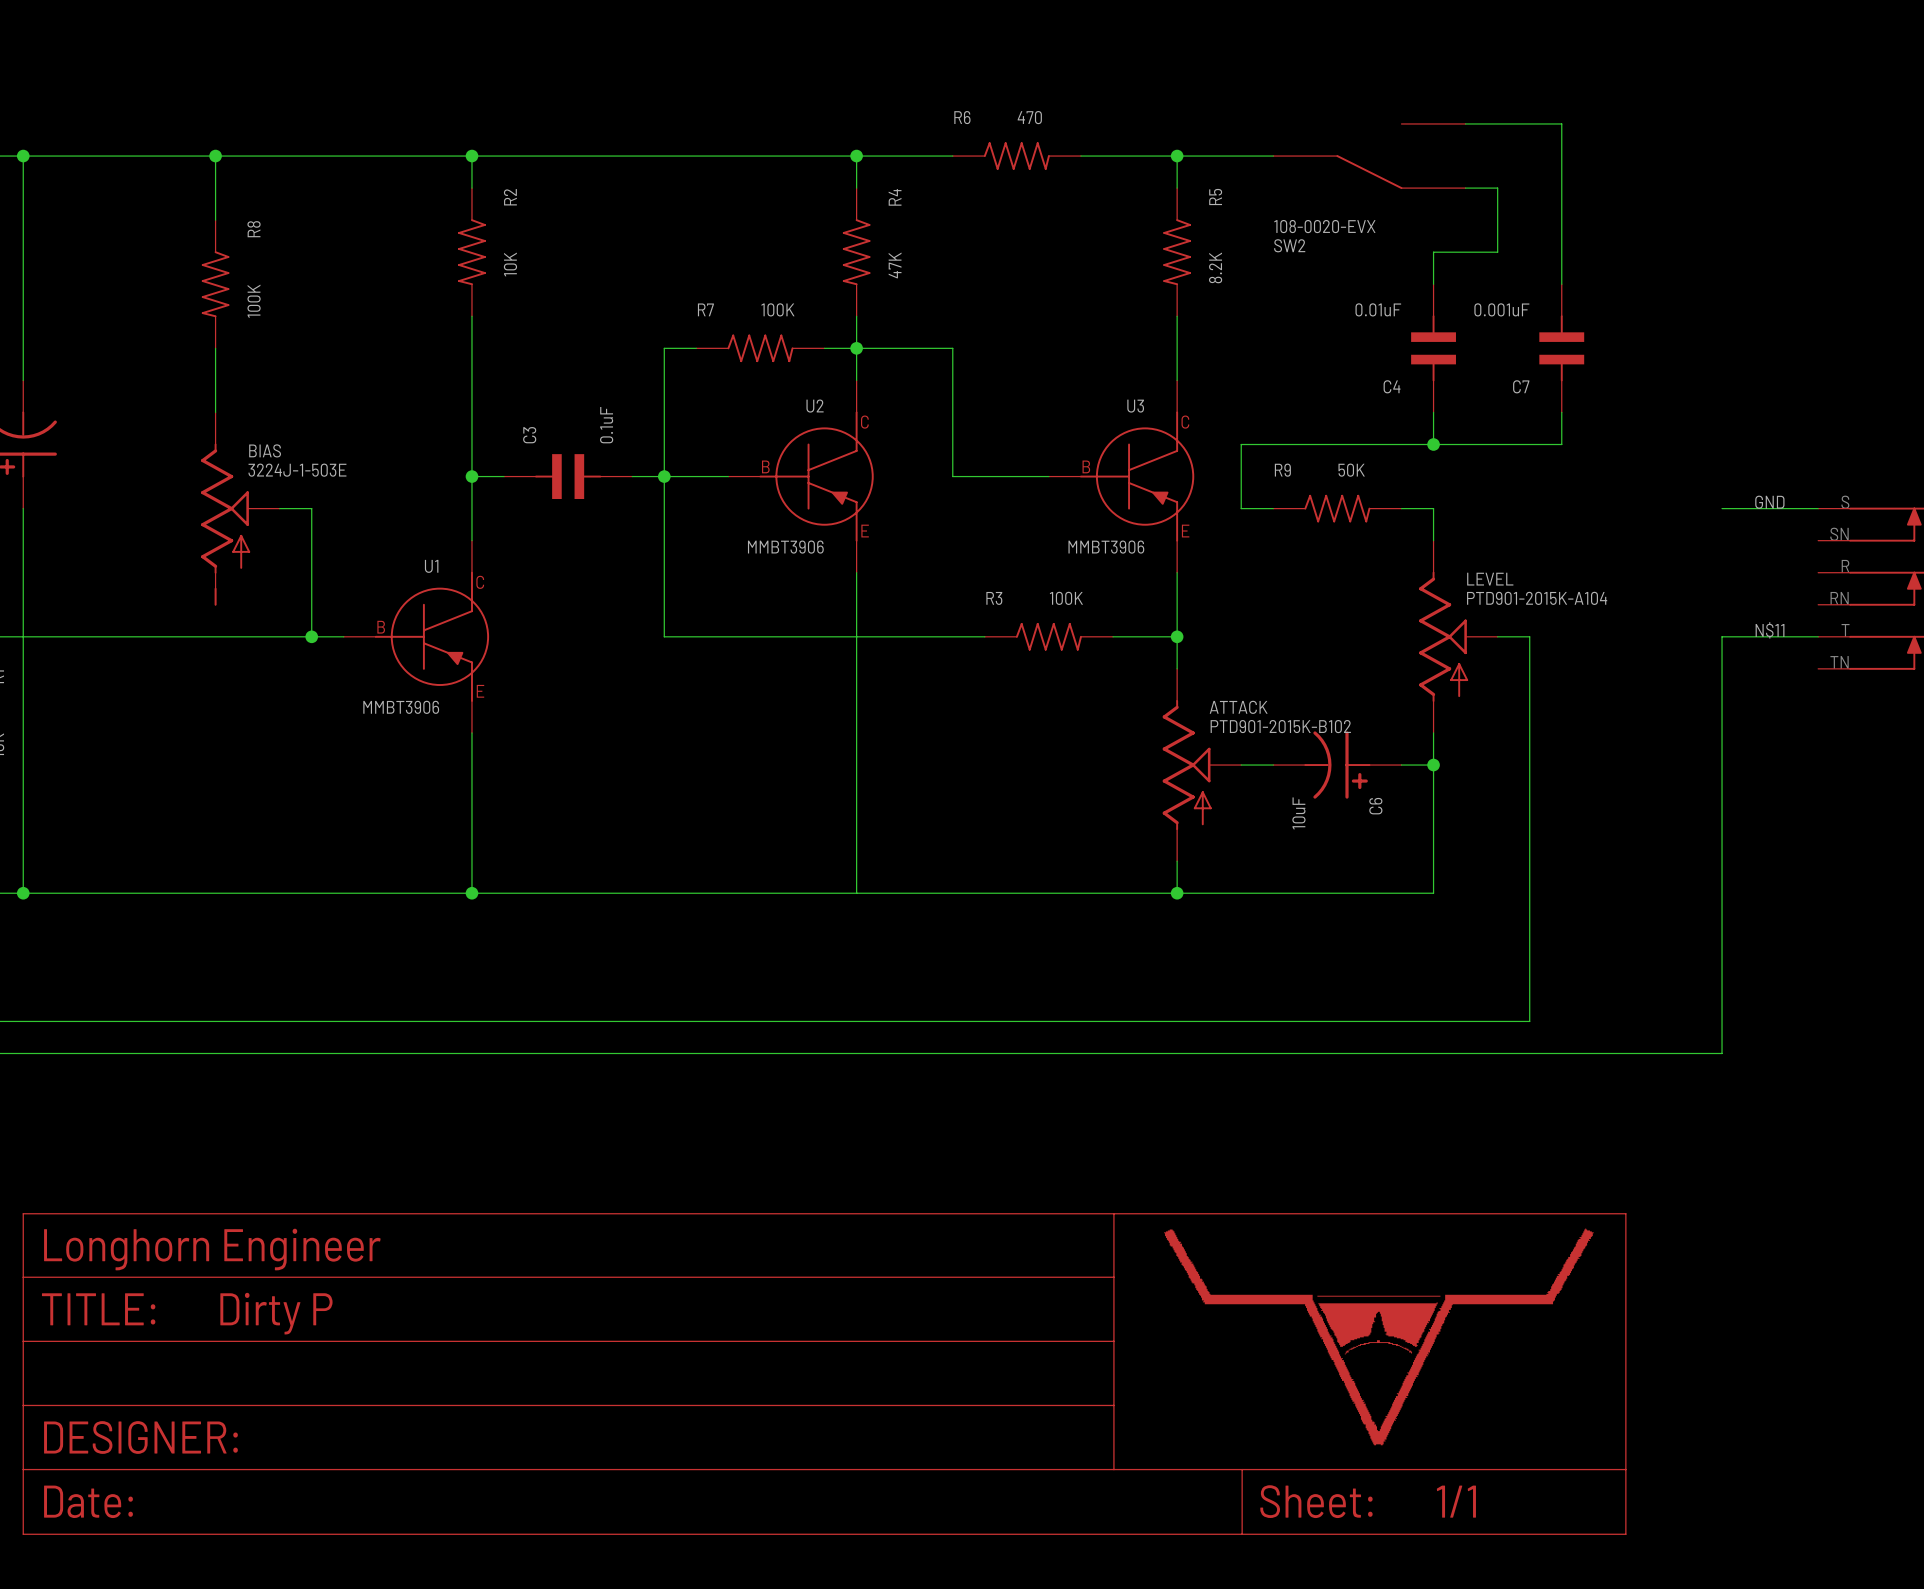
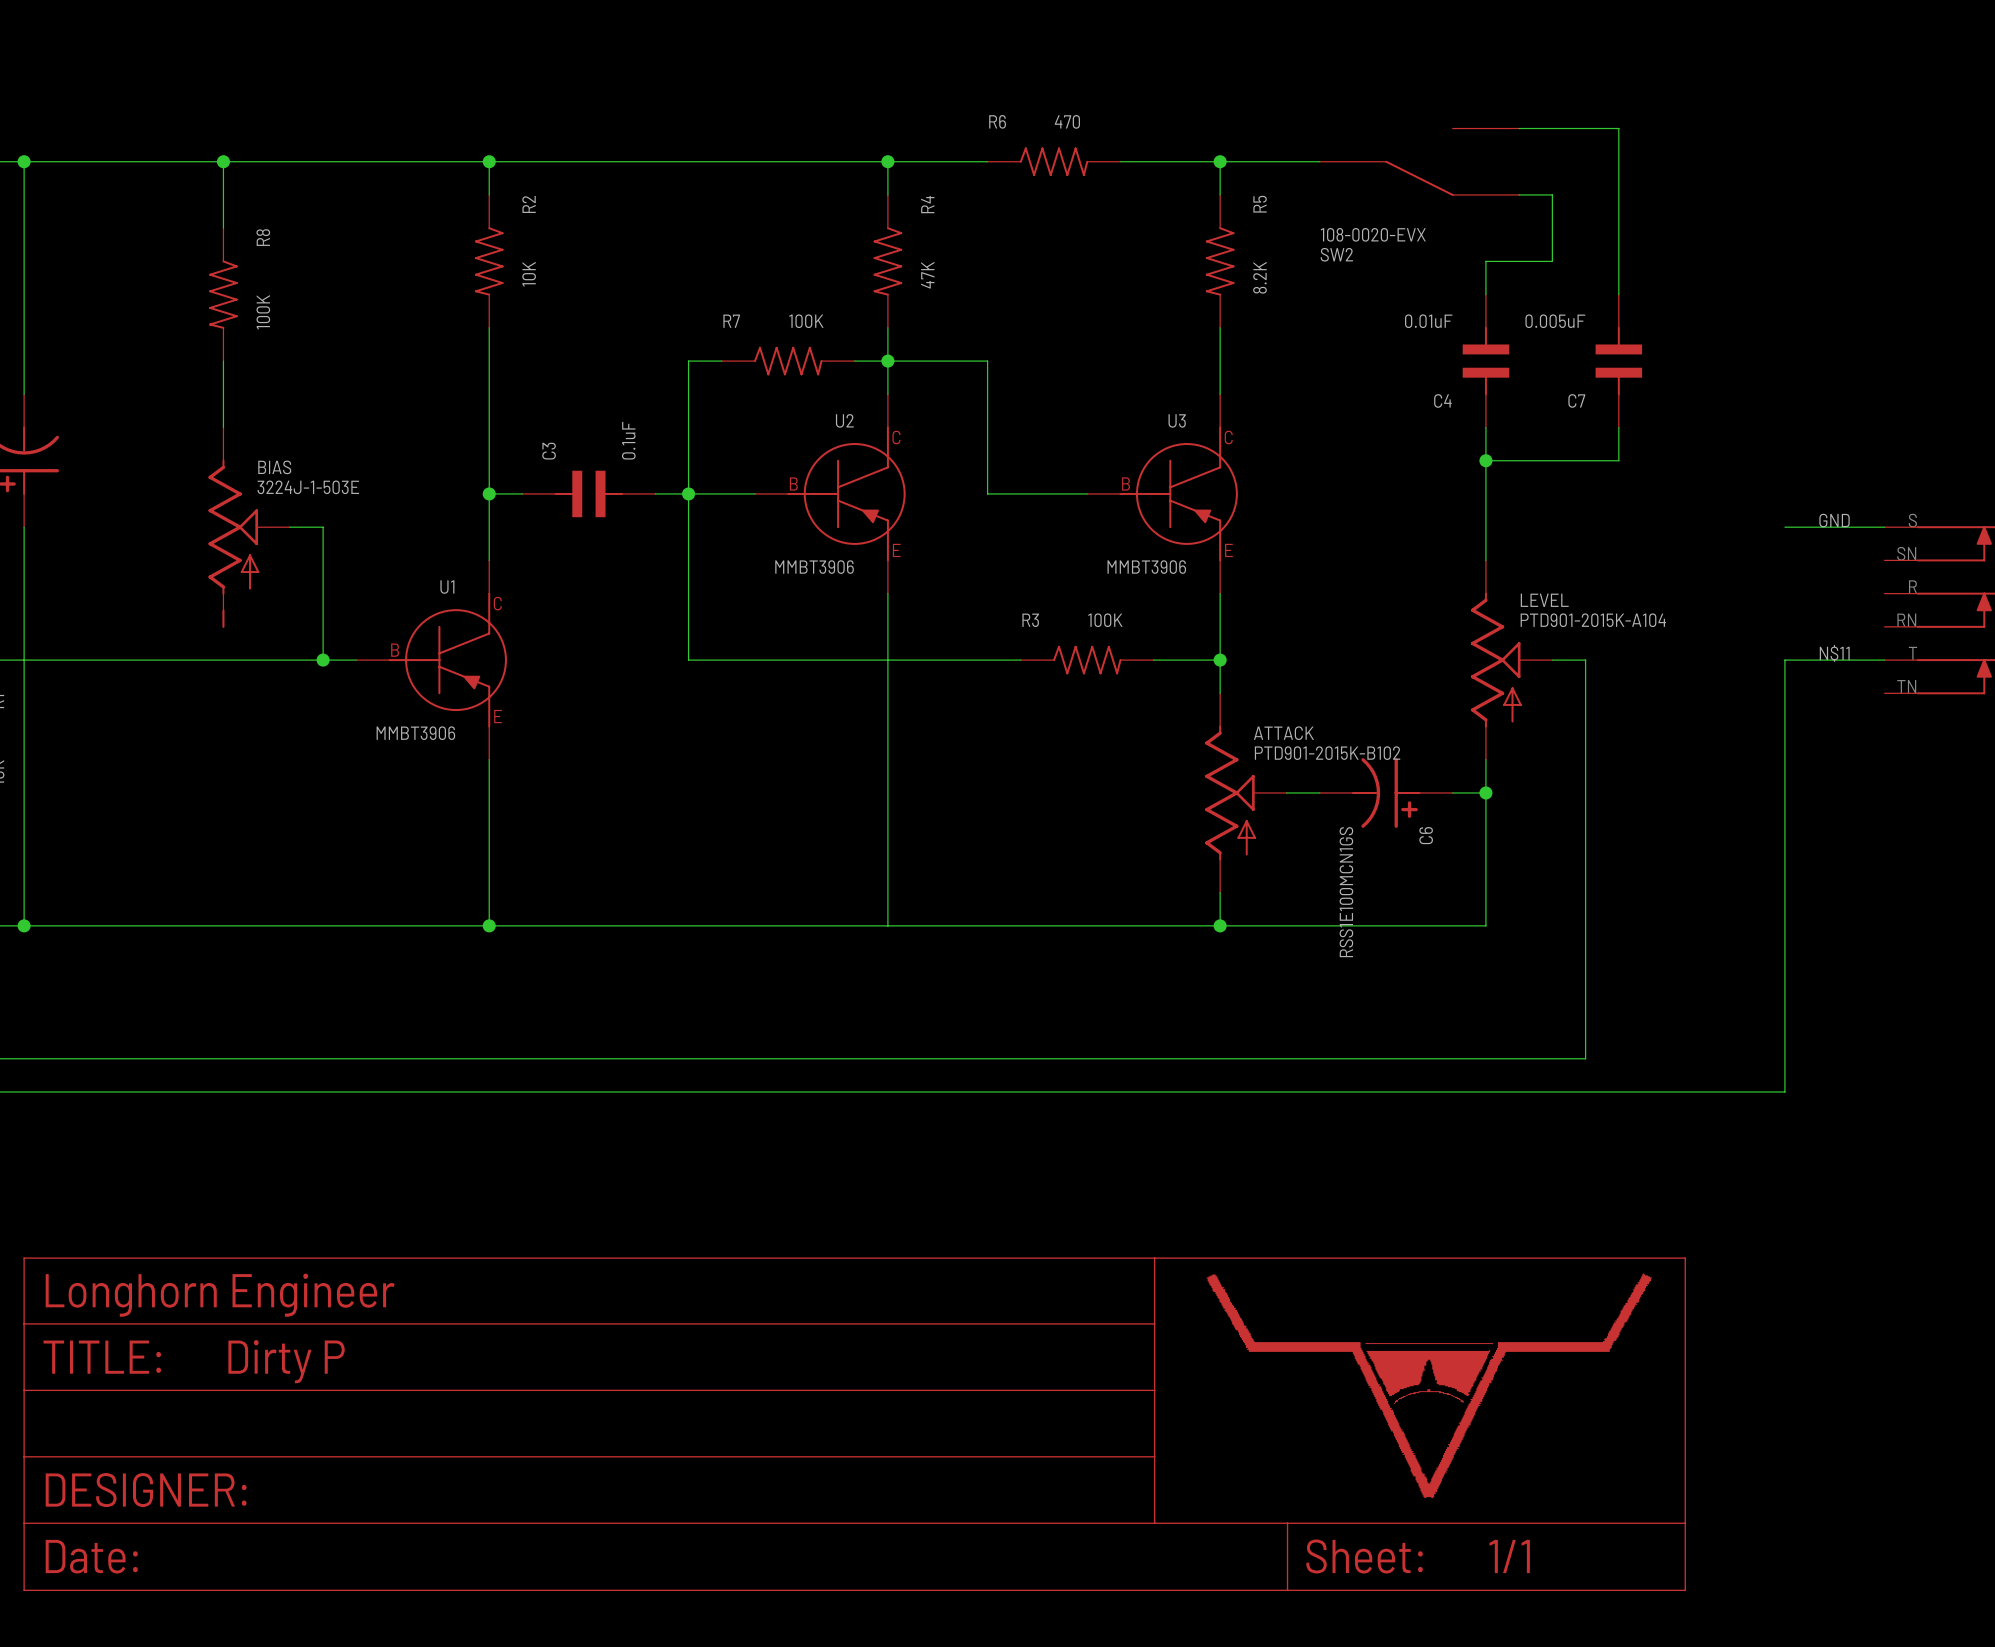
C7 value: 0.001uF (1501, 309) -> 0.005uF (1555, 321)
wire: (1433, 444) (1241, 444) (1241, 508) (1273, 508) -> none
R9: 50K (1337, 508) -> none
wire: (1401, 508) (1433, 508) -> (1485, 460) (1485, 527)
C6 value: 10uF (1298, 813) -> RSS1E100MCN1GS (1346, 892)

